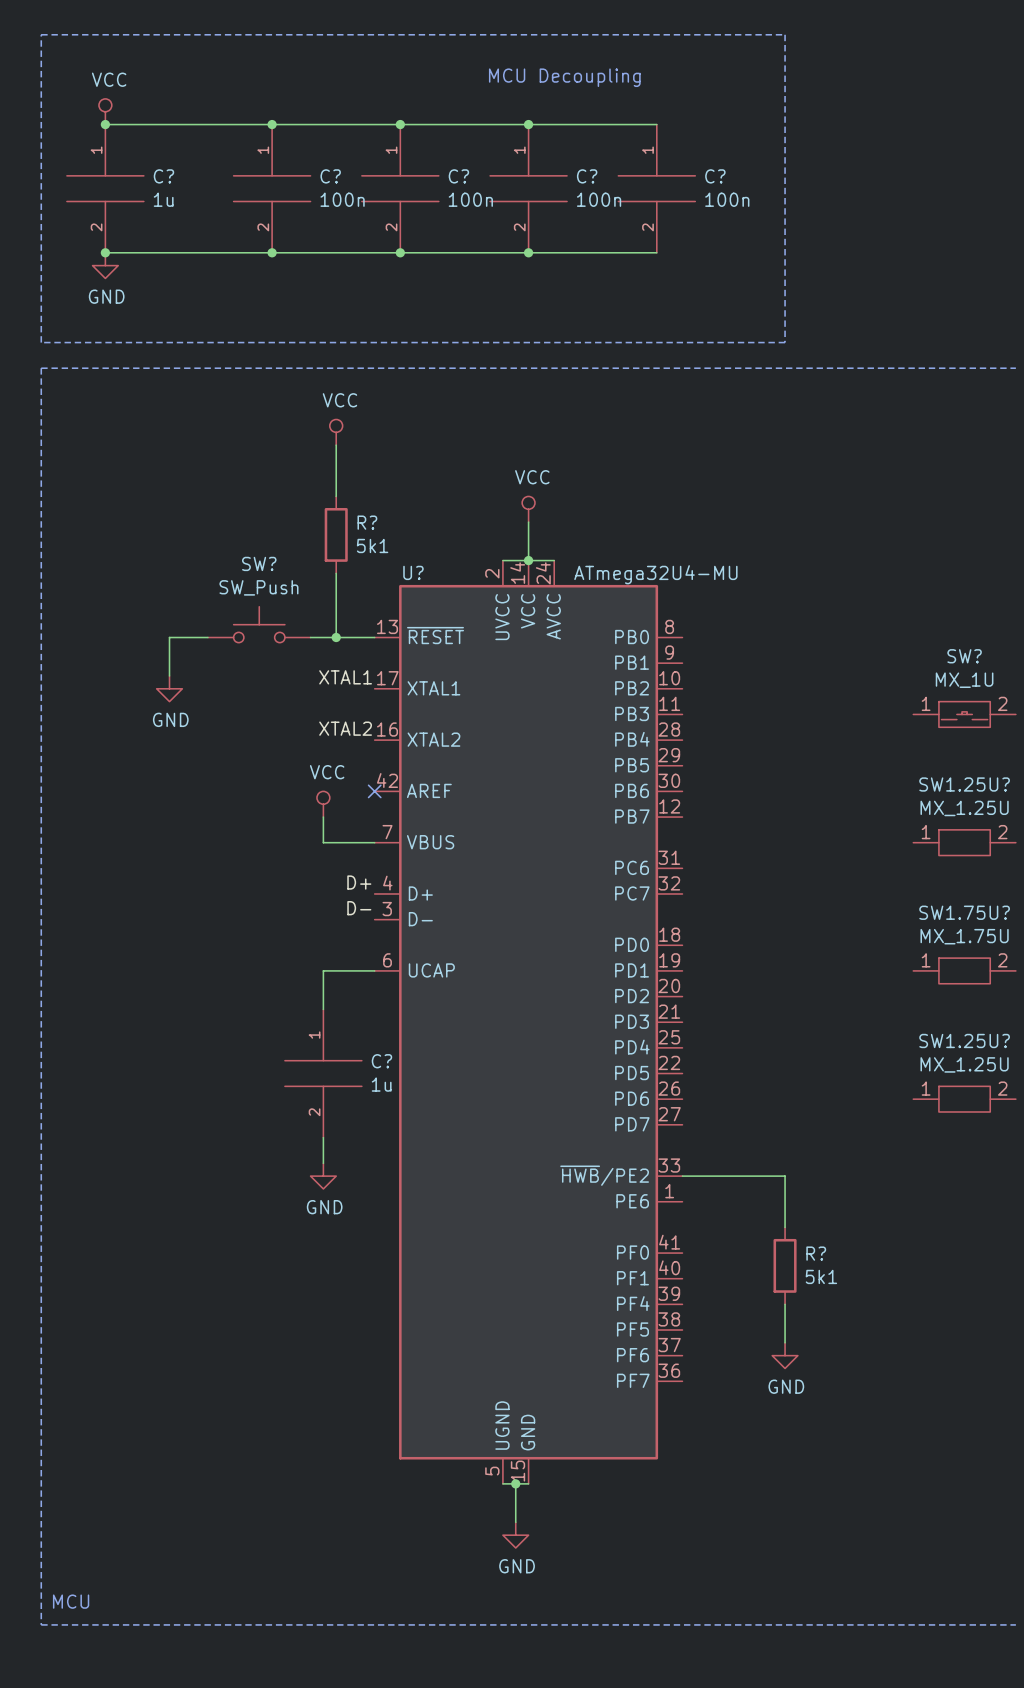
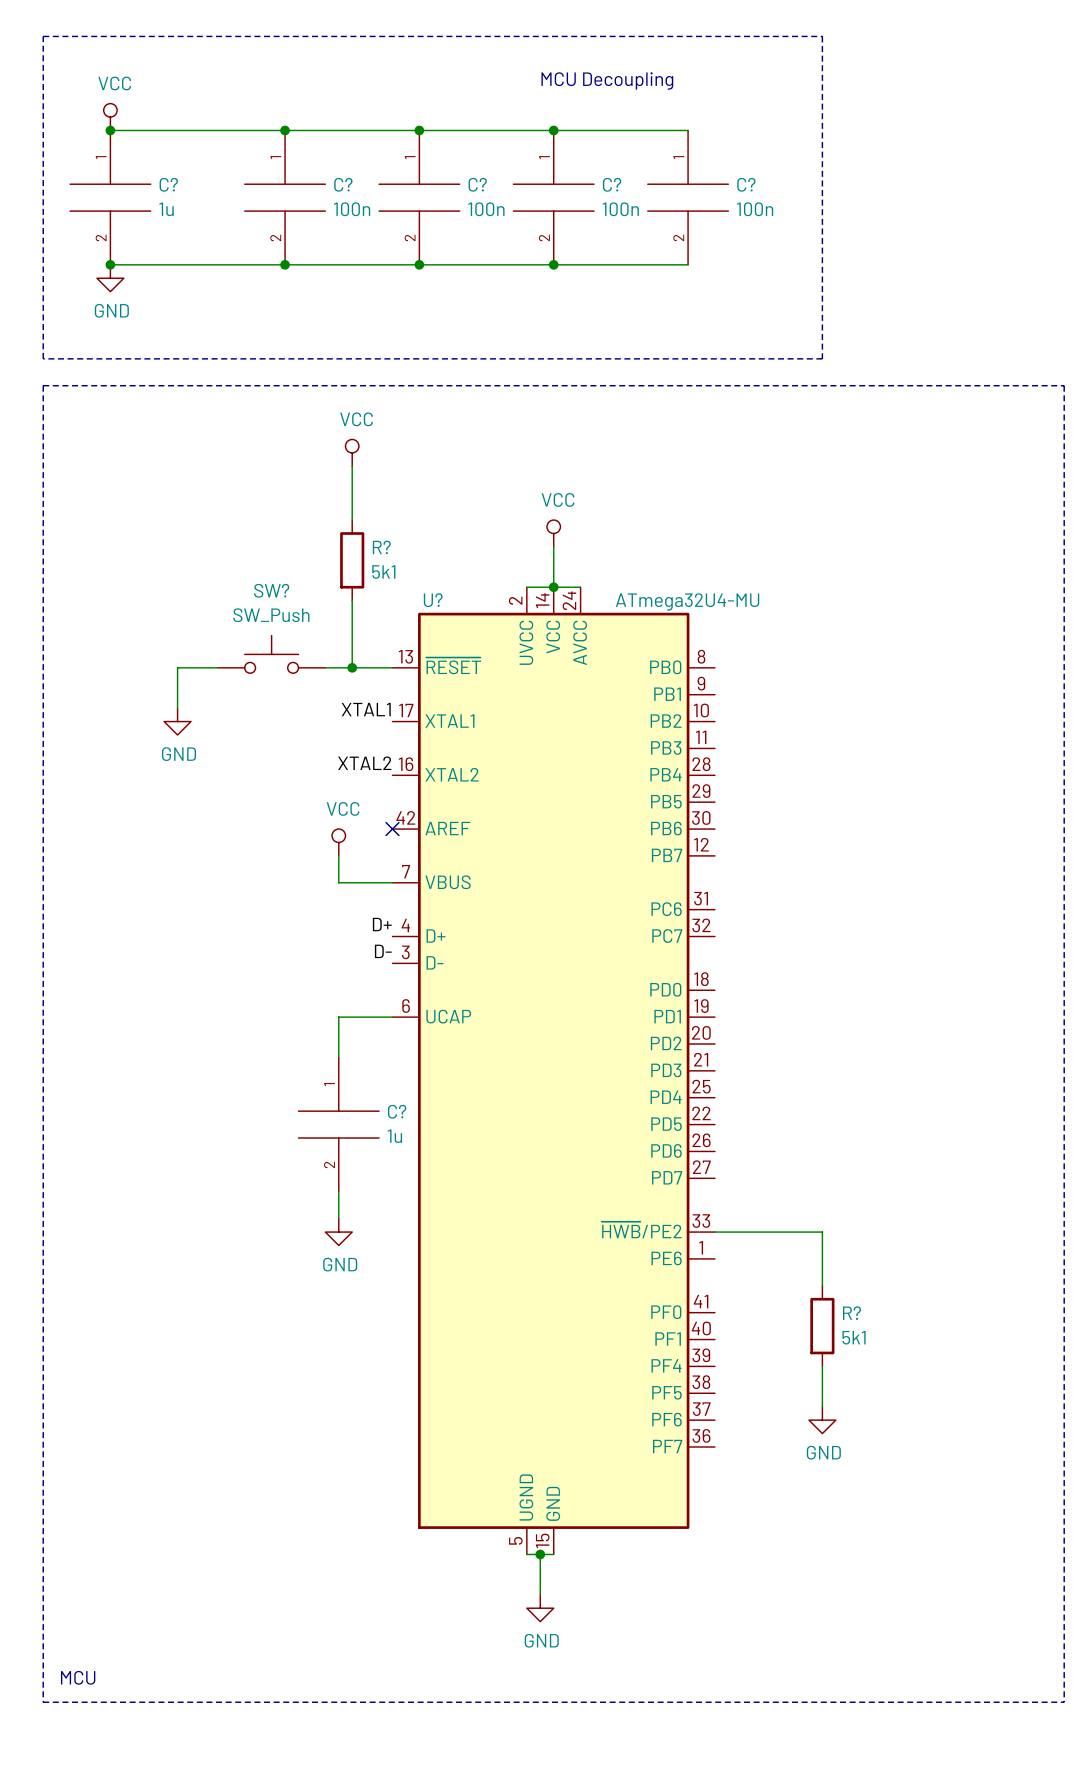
line: none -> (1064, 385) (1064, 1702)
SW?: MX_1U (964, 714) -> none
SW1.25U?: MX_1.25U (964, 842) -> none
SW1.75U?: MX_1.75U (964, 970) -> none
SW1.25U?: MX_1.25U (964, 1099) -> none

